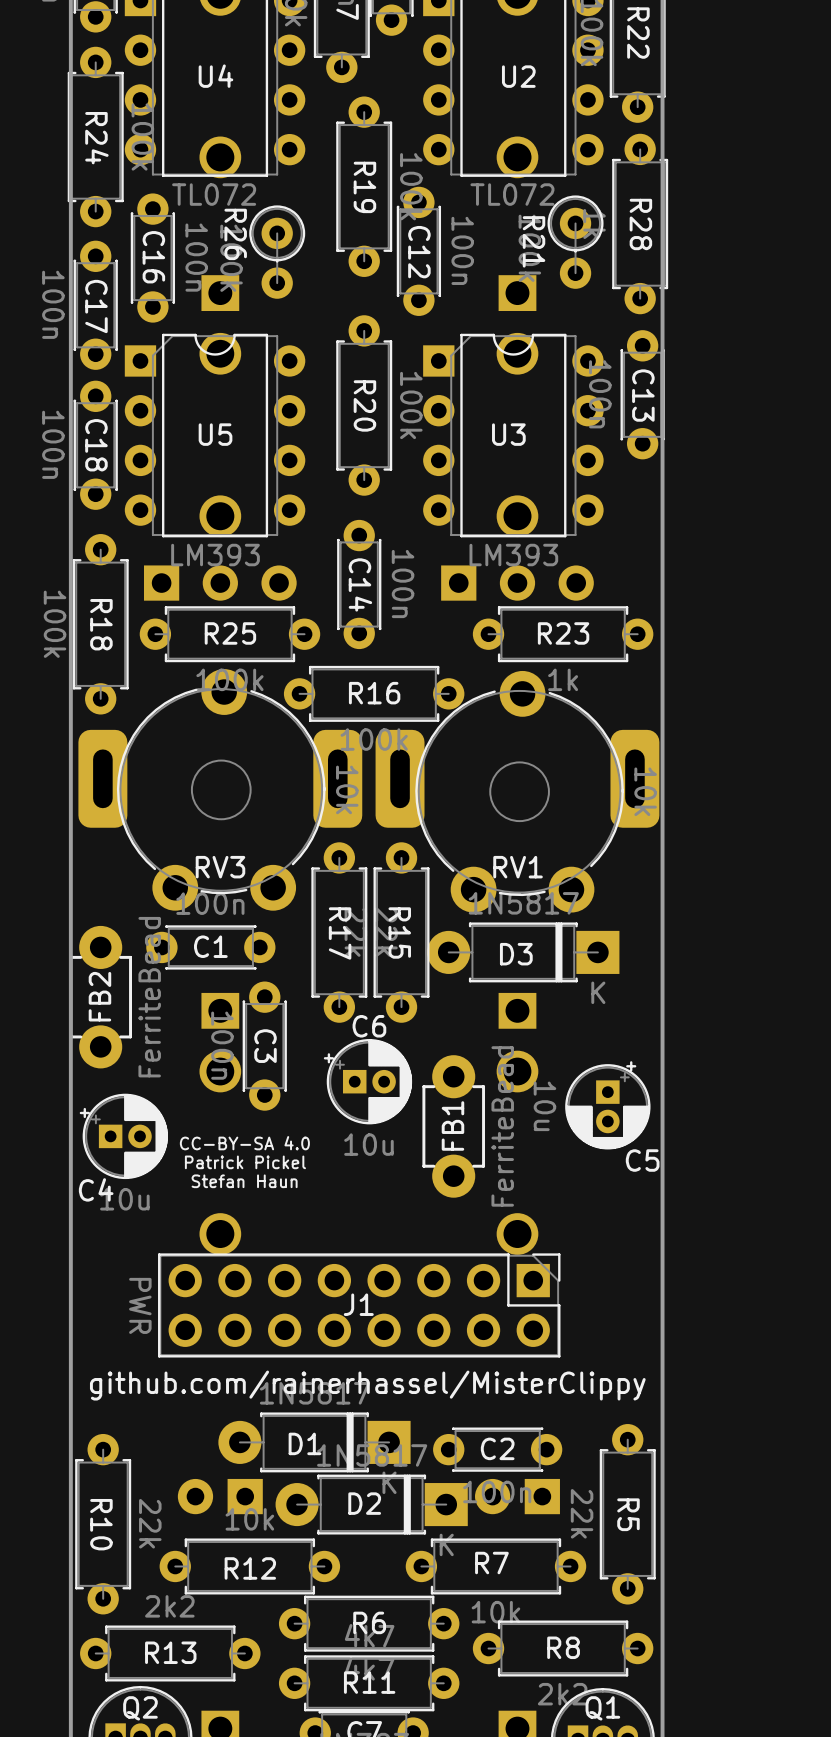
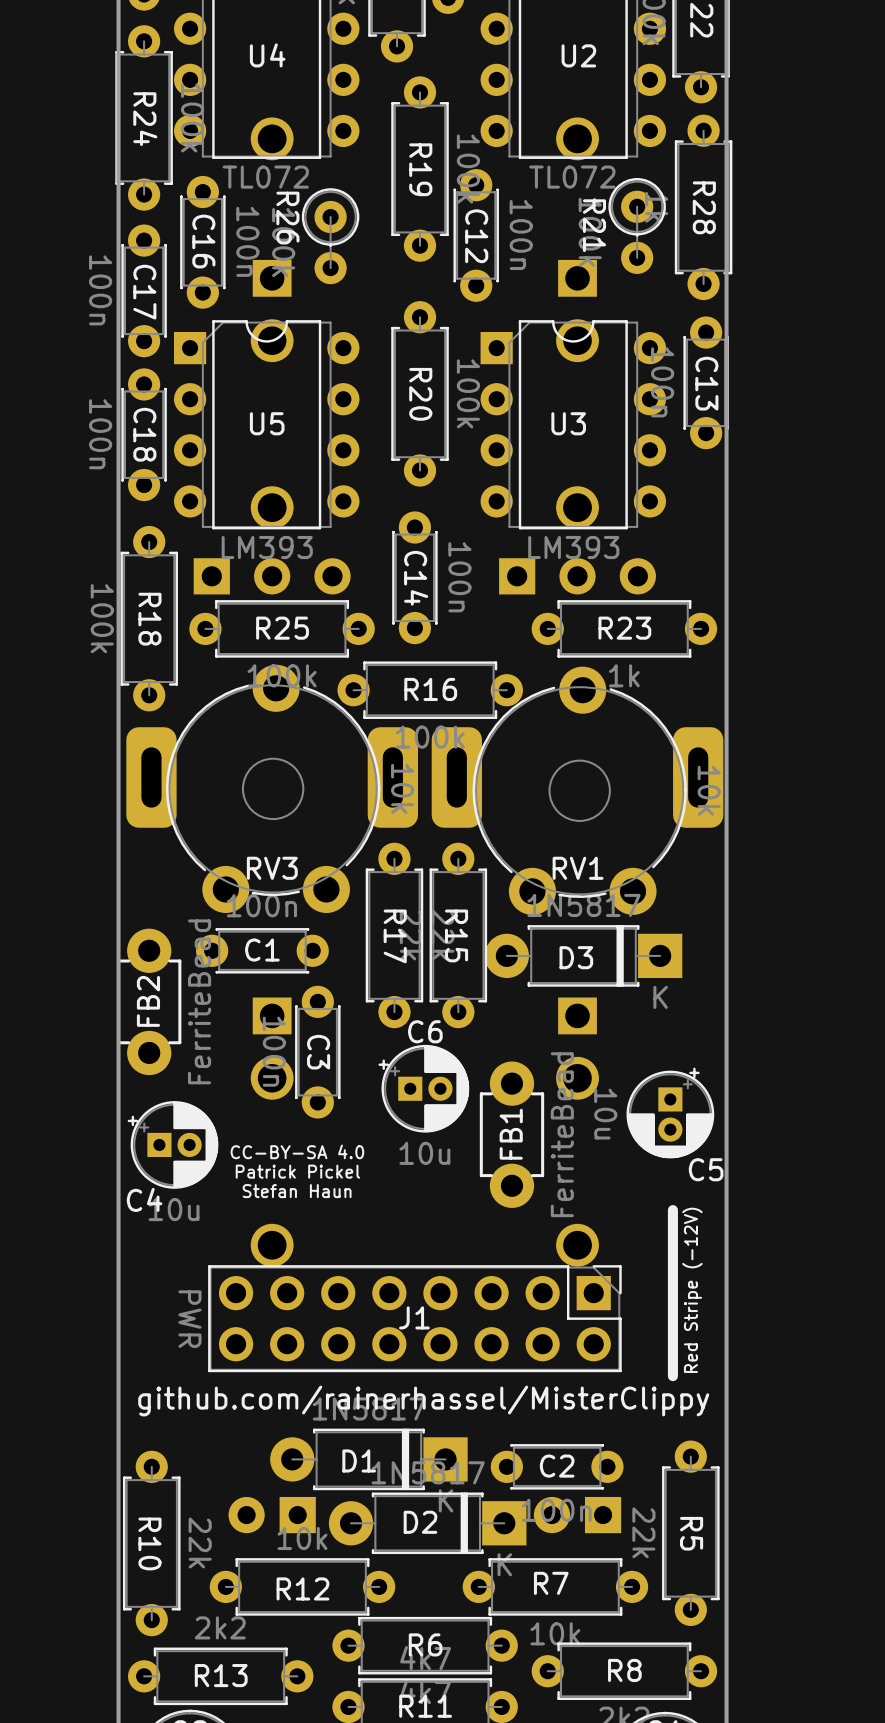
line: none -> (672, 1210) (672, 1376)
text: none -> Red Stripe (-12V) (692, 1290)

